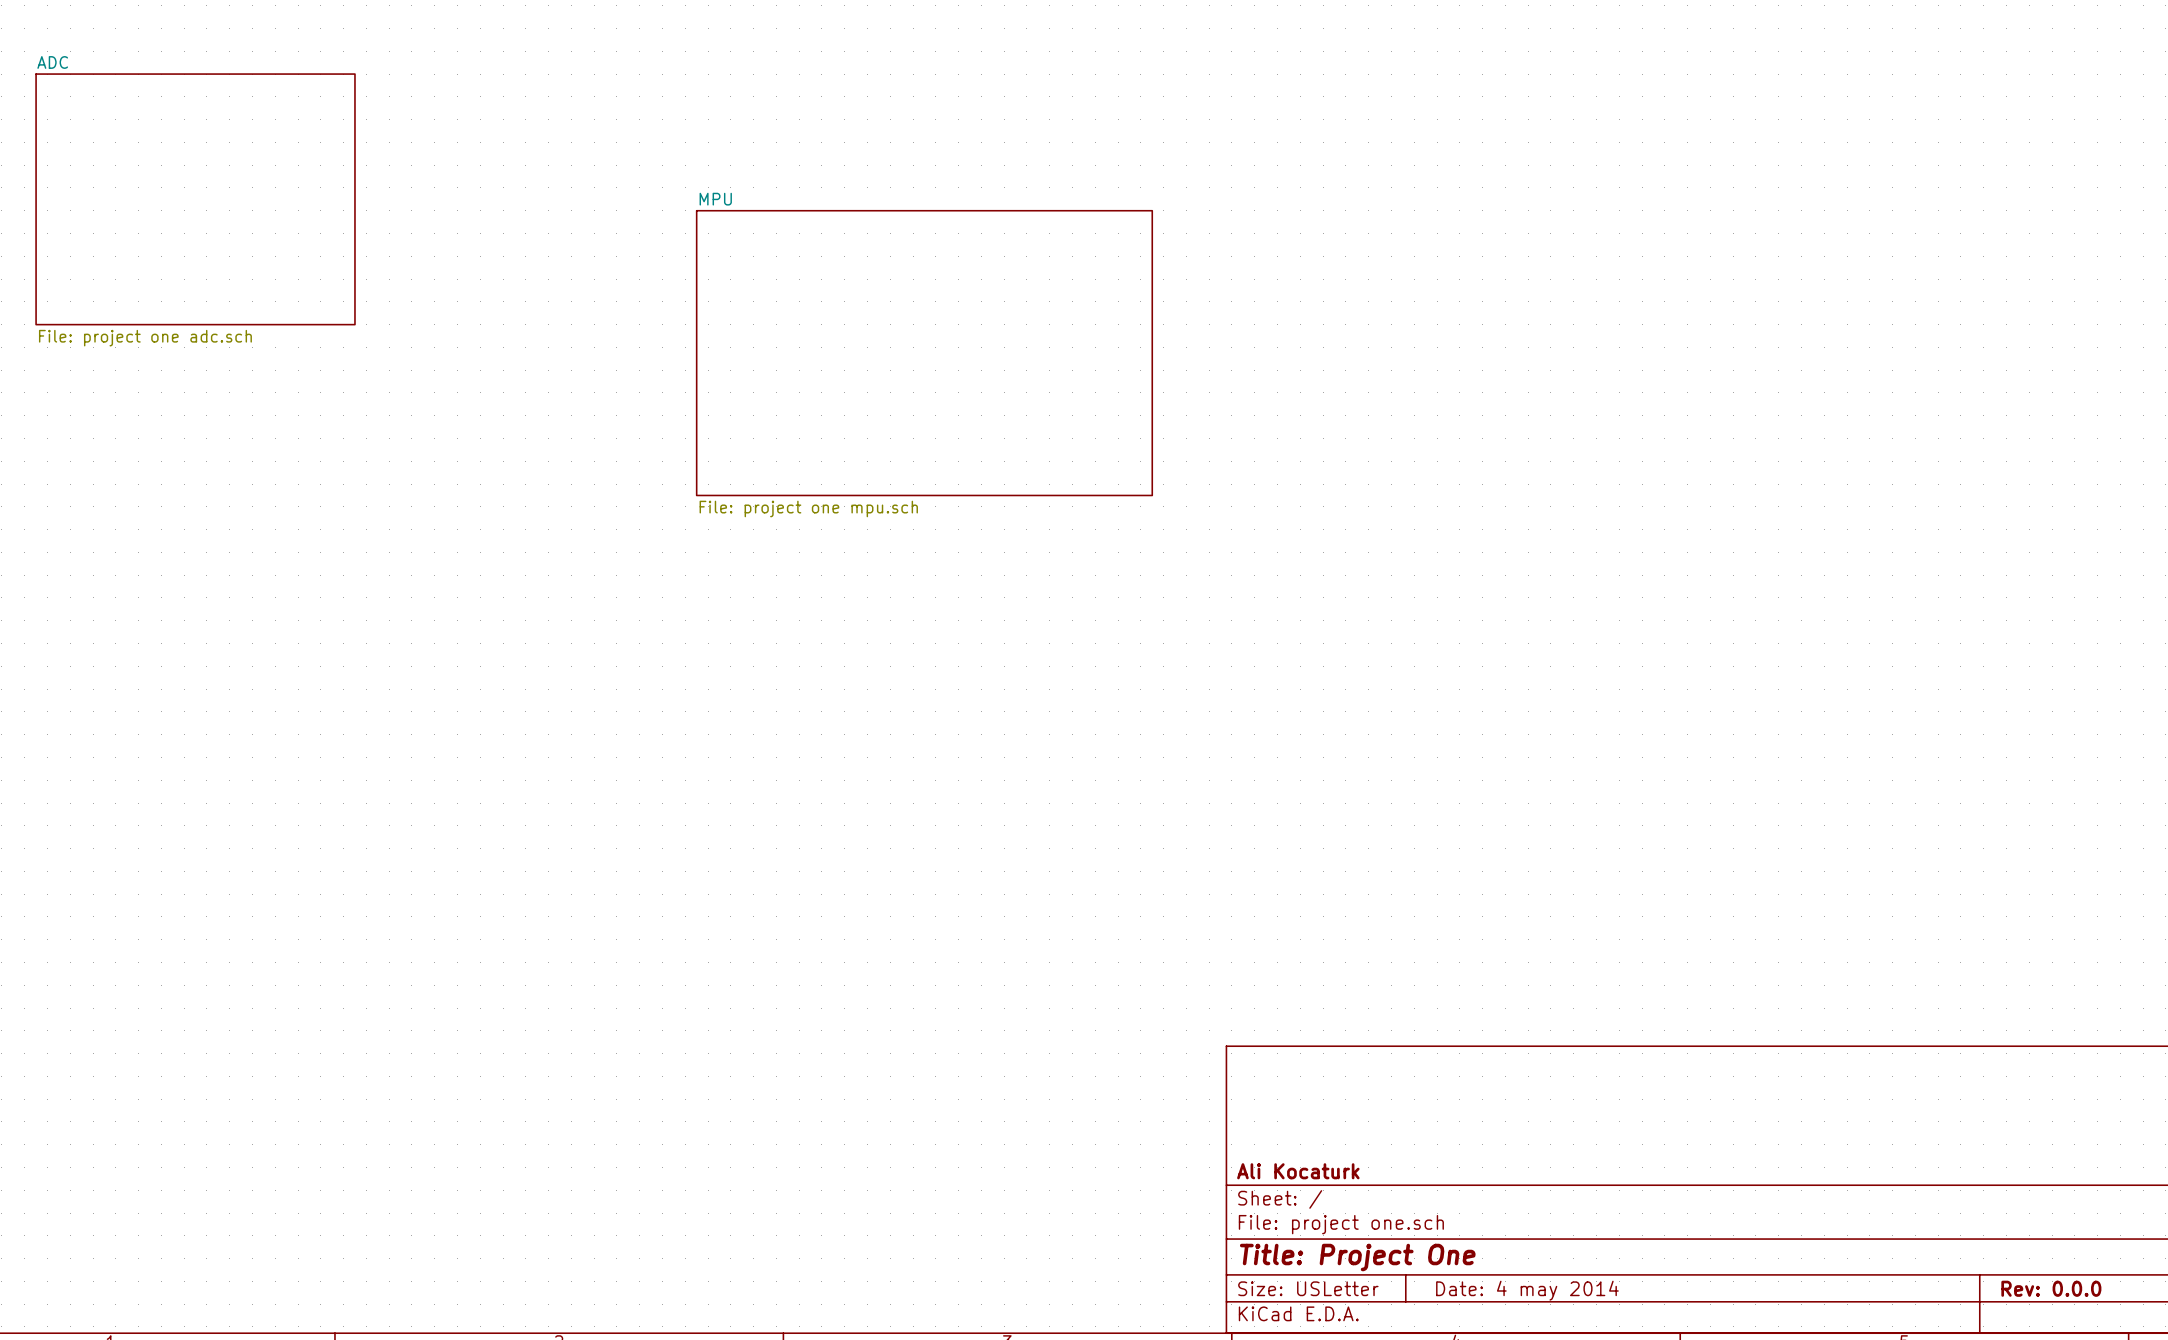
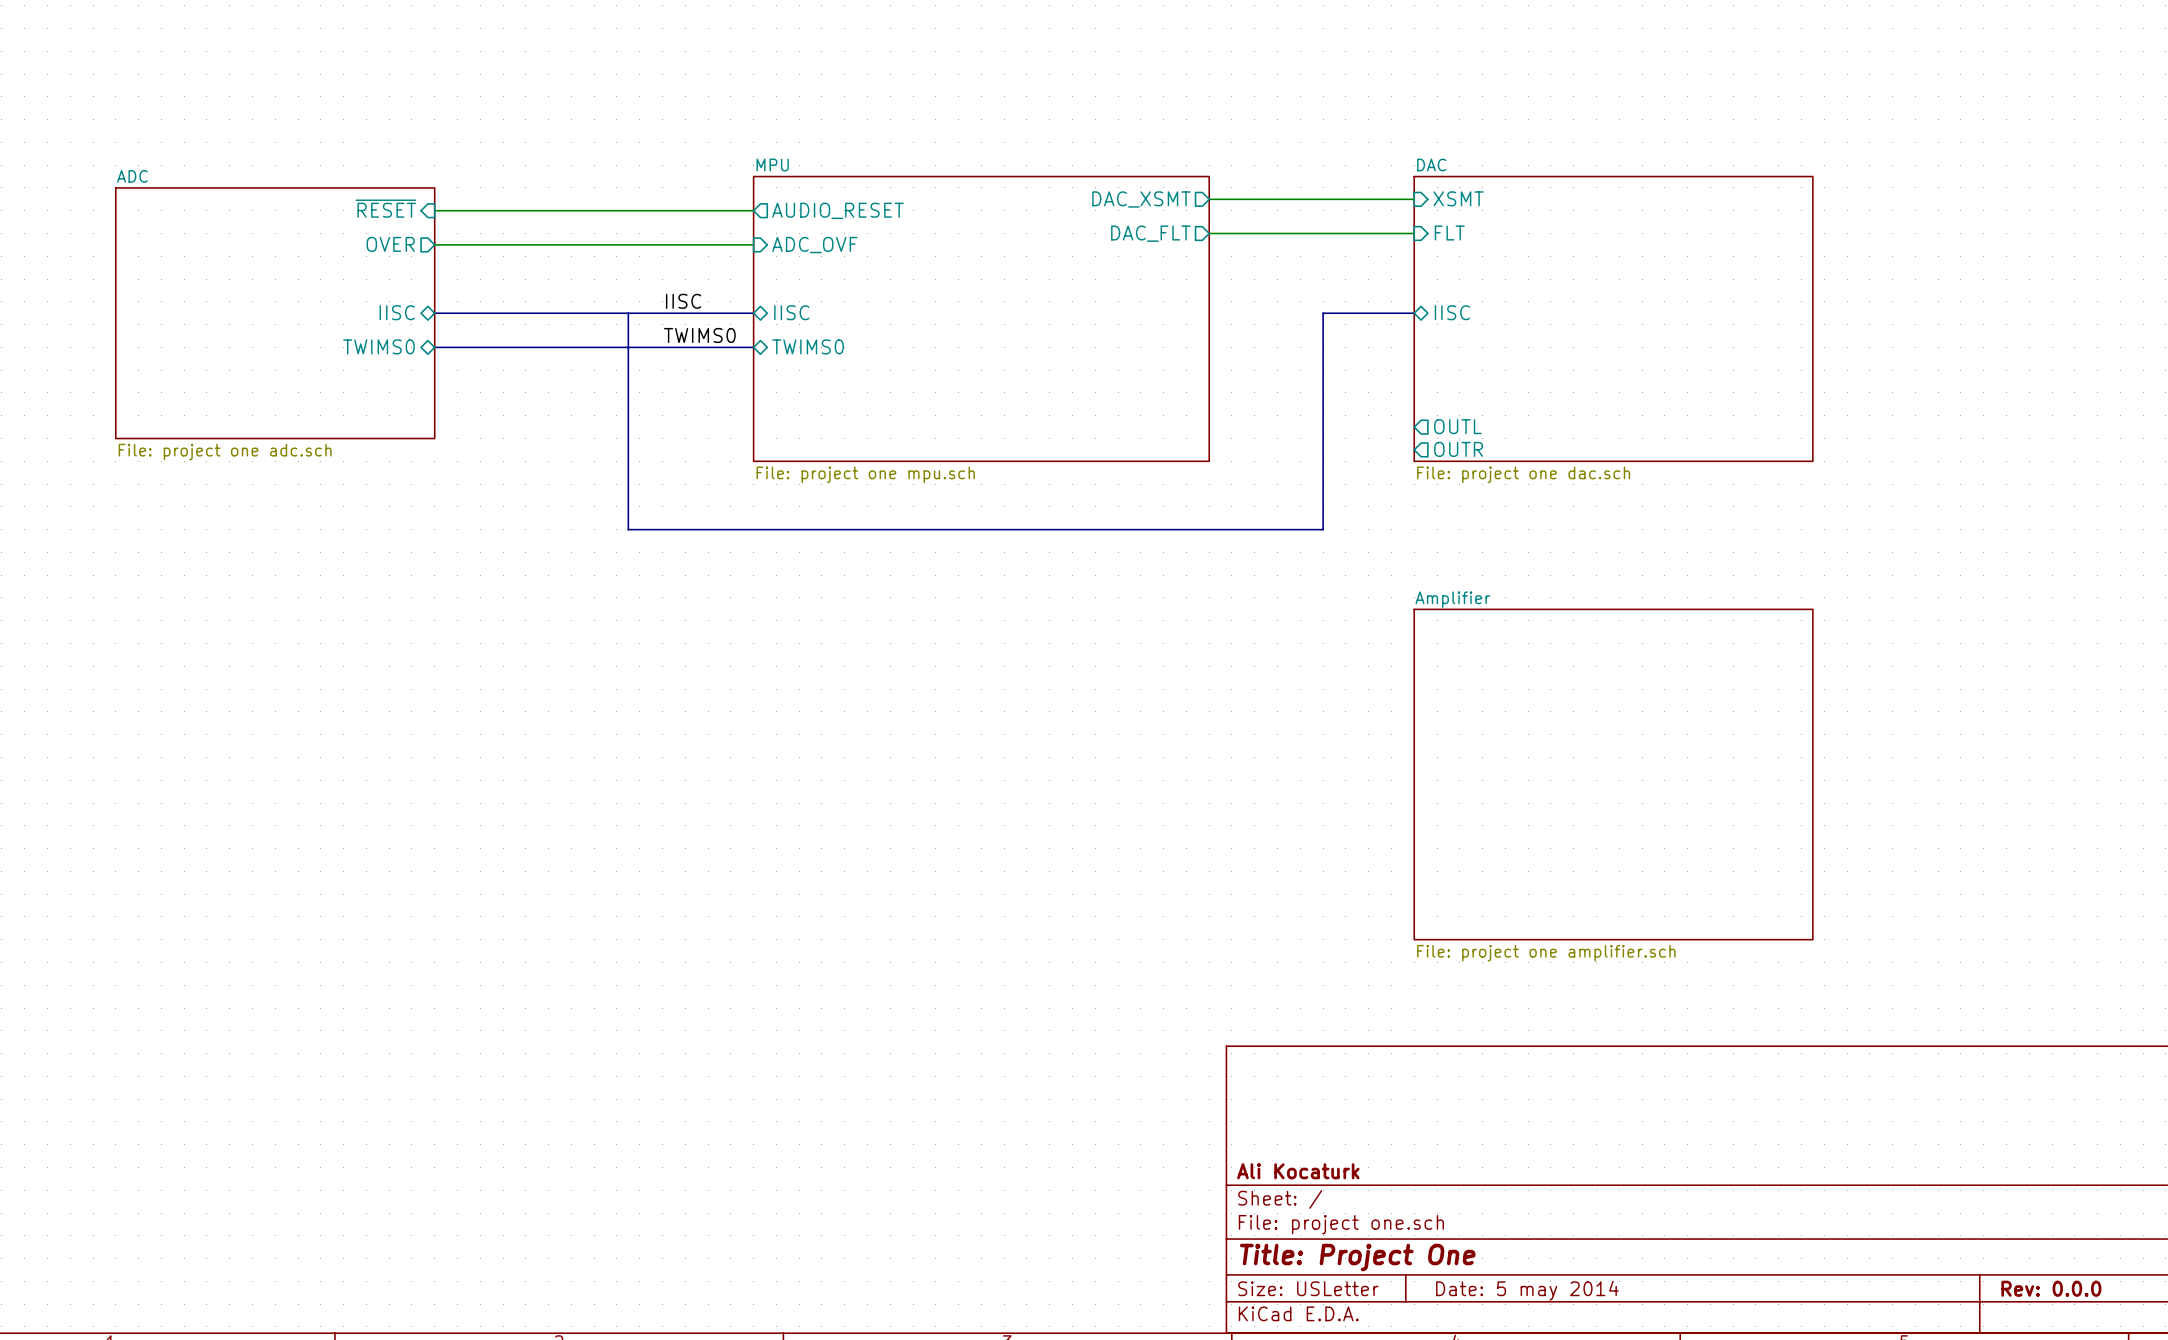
sheet pin: none -> XSMT (1458, 198)
sheet ADC position: (195, 199) -> (275, 313)
sheet pin: none -> DAC_XSMT (1141, 199)
wire: none -> (1209, 199) (1414, 199)
sheet pin: none -> ~{RESET} (385, 208)
wire: none -> (434, 210) (753, 210)
sheet pin: none -> AUDIO_RESET (837, 210)
sheet pin: none -> DAC_FLT (1150, 233)
wire: none -> (1209, 233) (1414, 233)
sheet pin: none -> FLT (1449, 233)
sheet pin: none -> OVER (390, 244)
wire: none -> (434, 244) (753, 244)
sheet pin: none -> ADC_OVF (814, 245)
label: none -> IISC (683, 301)
sheet pin: none -> IISC (397, 312)
sheet pin: none -> IISC (791, 312)
sheet pin: none -> IISC (1452, 312)
bus: none -> (434, 313) (753, 313)
bus: none -> (628, 313) (628, 529) (1323, 529) (1323, 313) (1414, 313)
sheet DAC: none -> File: project one dac.sch (1613, 318)
label: none -> TWIMS0 (699, 335)
sheet pin: none -> TWIMS0 (378, 346)
sheet pin: none -> TWIMS0 (808, 346)
bus: none -> (434, 347) (753, 347)
sheet MPU position: (924, 353) -> (981, 318)
sheet pin: none -> OUTL (1457, 426)
sheet pin: none -> OUTR (1458, 449)
sheet Amplifier: none -> File: project one amplifier.sch (1613, 774)
title block: Date: 4 may 2014 (1527, 1290) -> Date: 5 may 2014 (1527, 1290)

